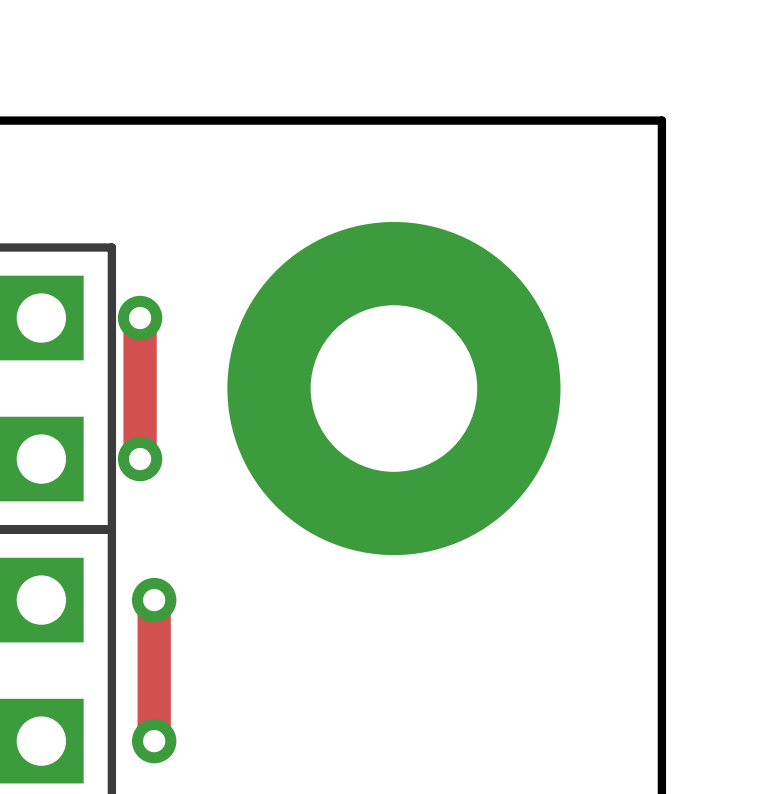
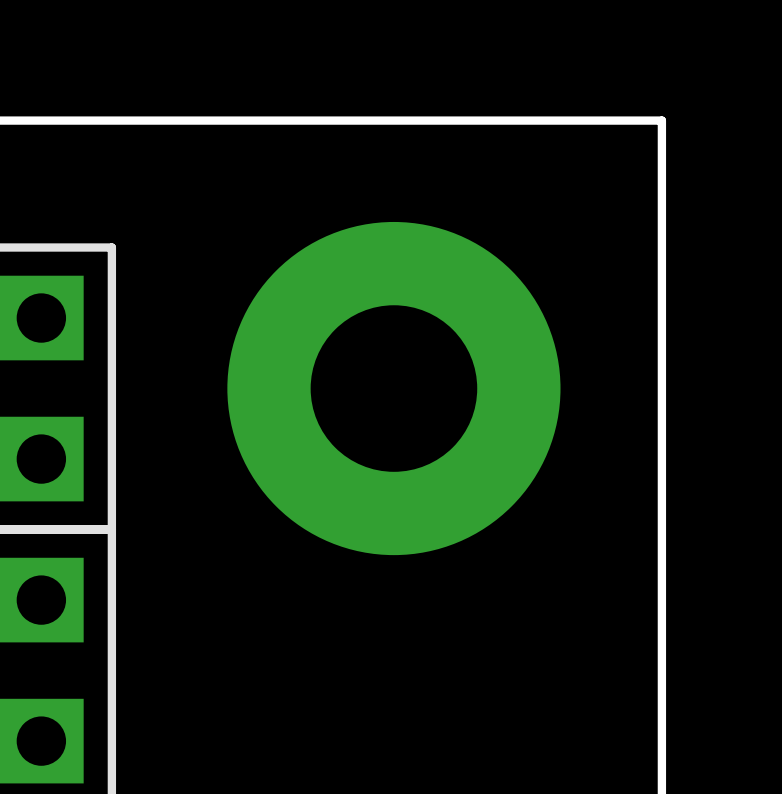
track: (140, 318) (140, 459) -> none
via: (140, 318) -> none
via: (140, 459) -> none
track: (154, 600) (154, 741) -> none
via: (154, 600) -> none
via: (154, 741) -> none

